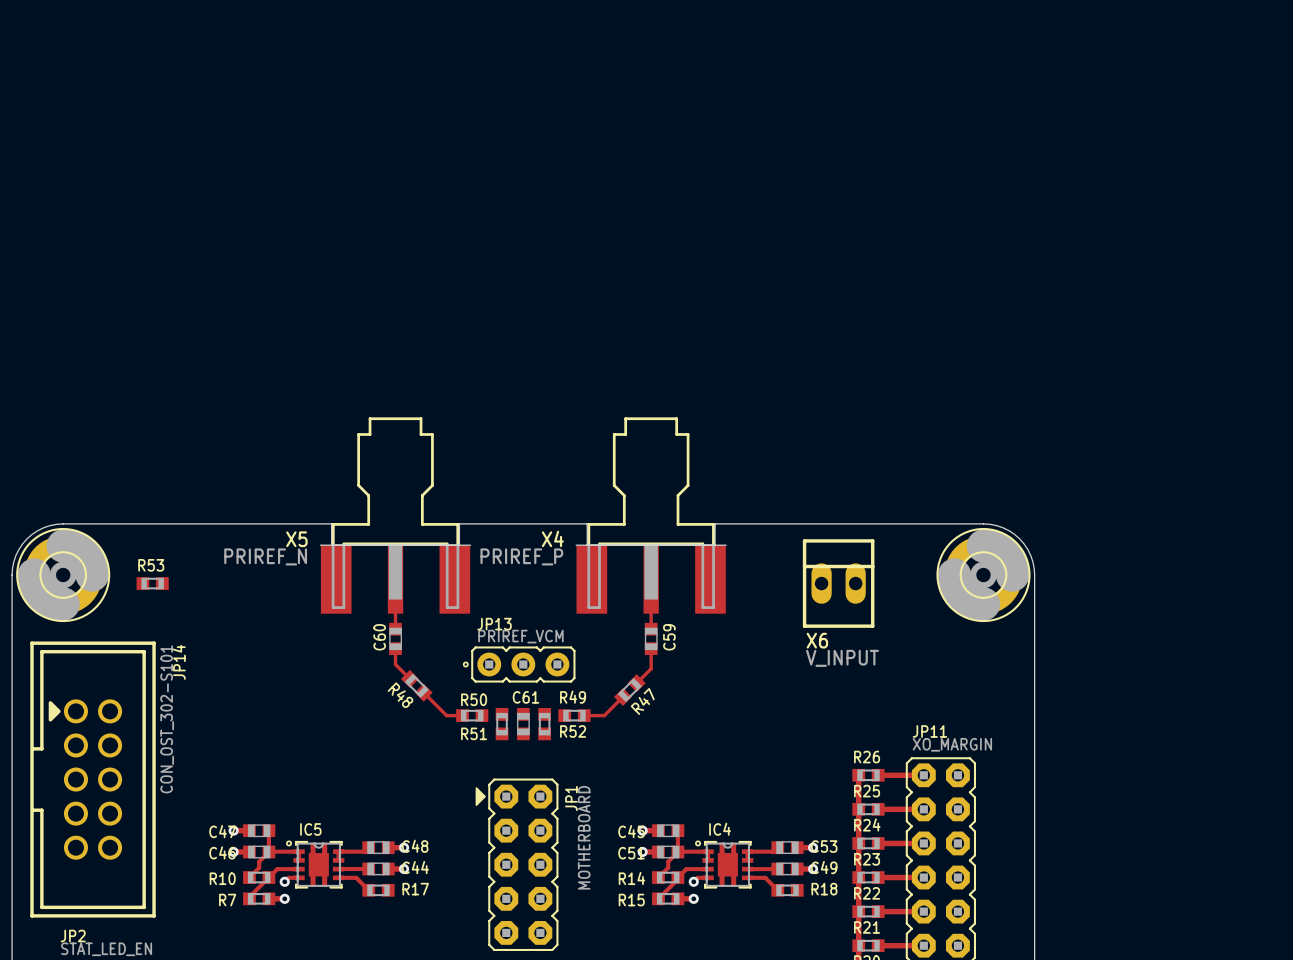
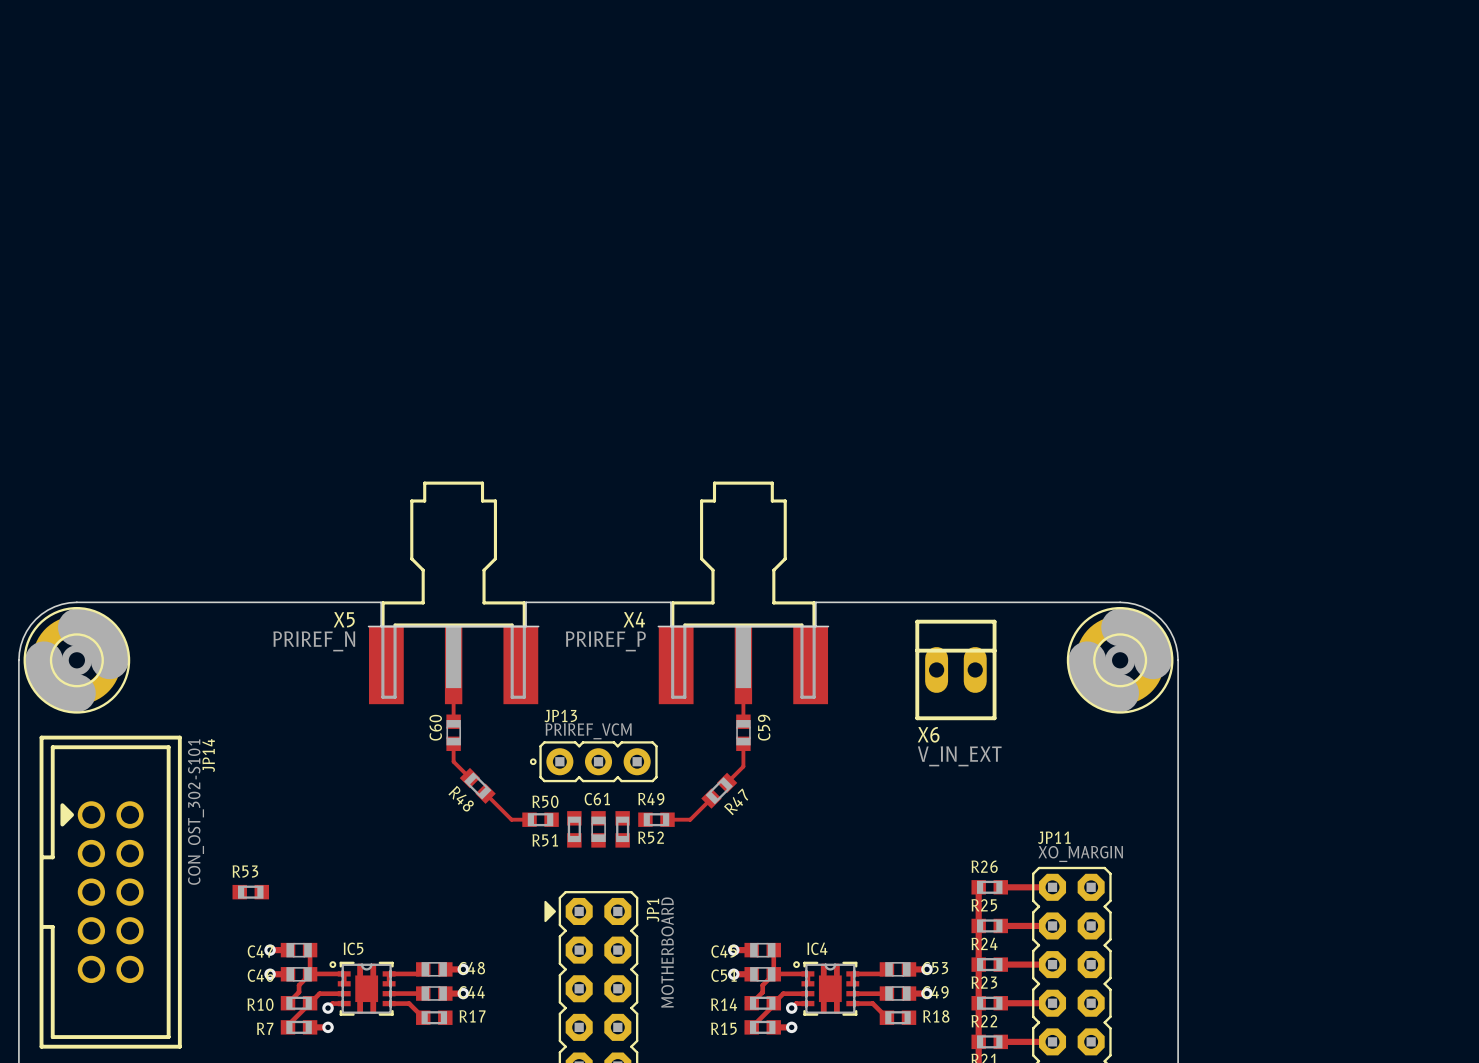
R53 position: (152, 583) -> (250, 892)
X6 value: V_INPUT (842, 658) -> V_IN_EXT (959, 756)

